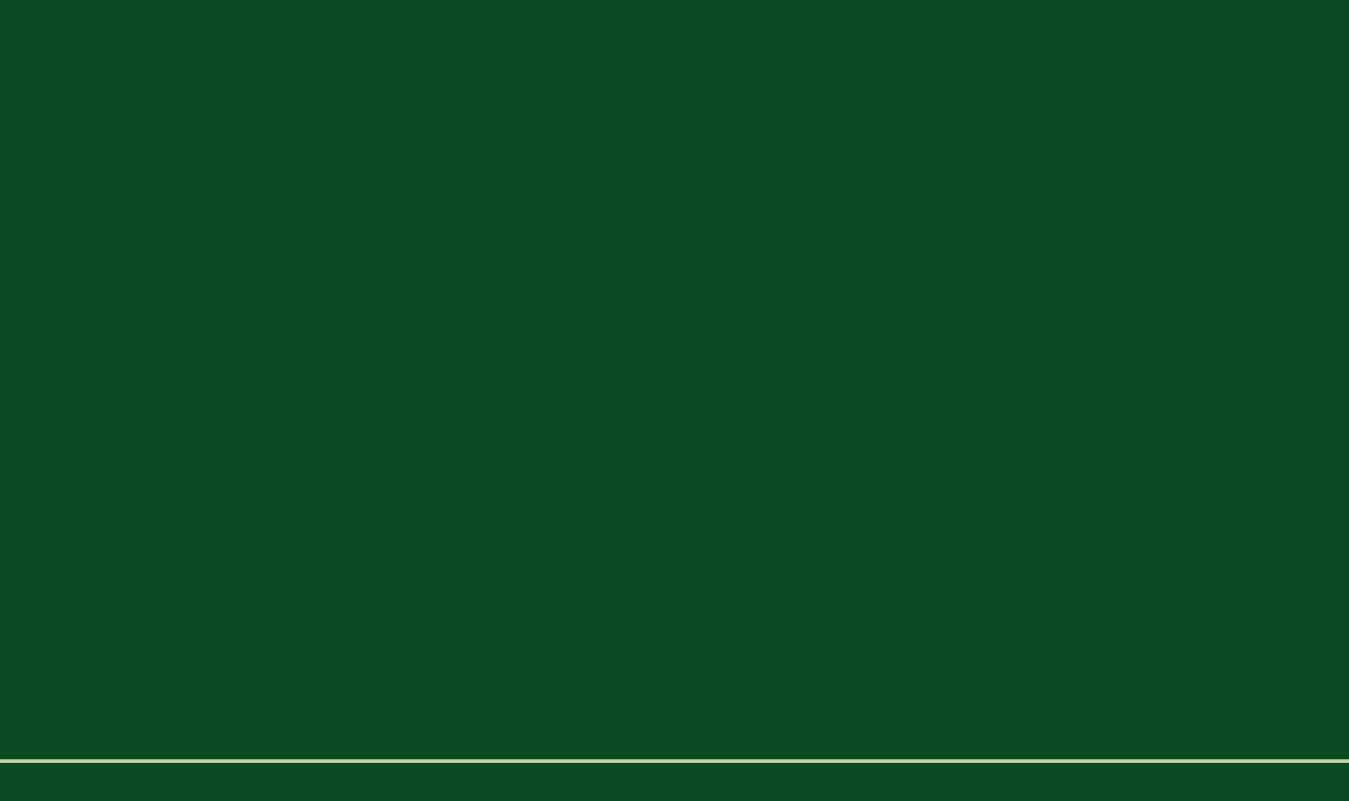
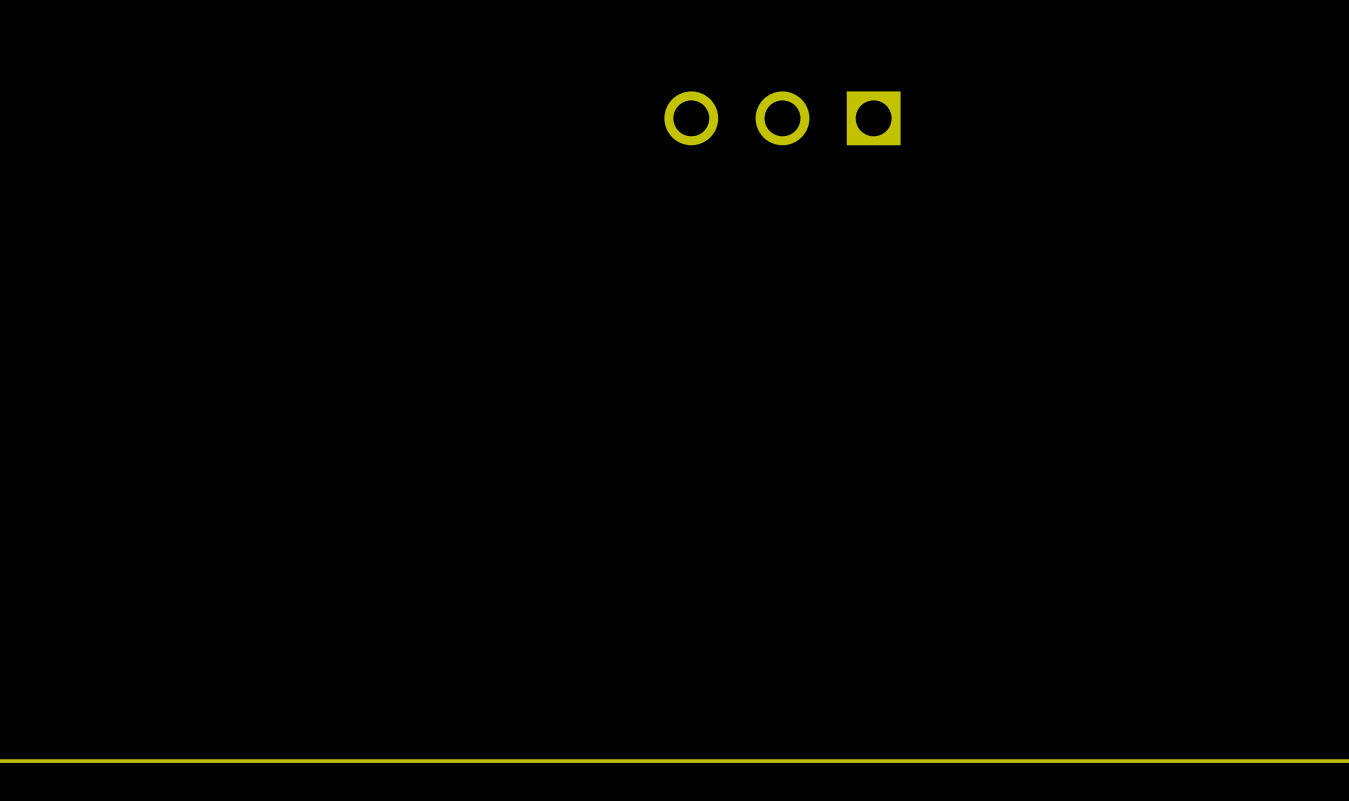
part: none -> (782, 118)

